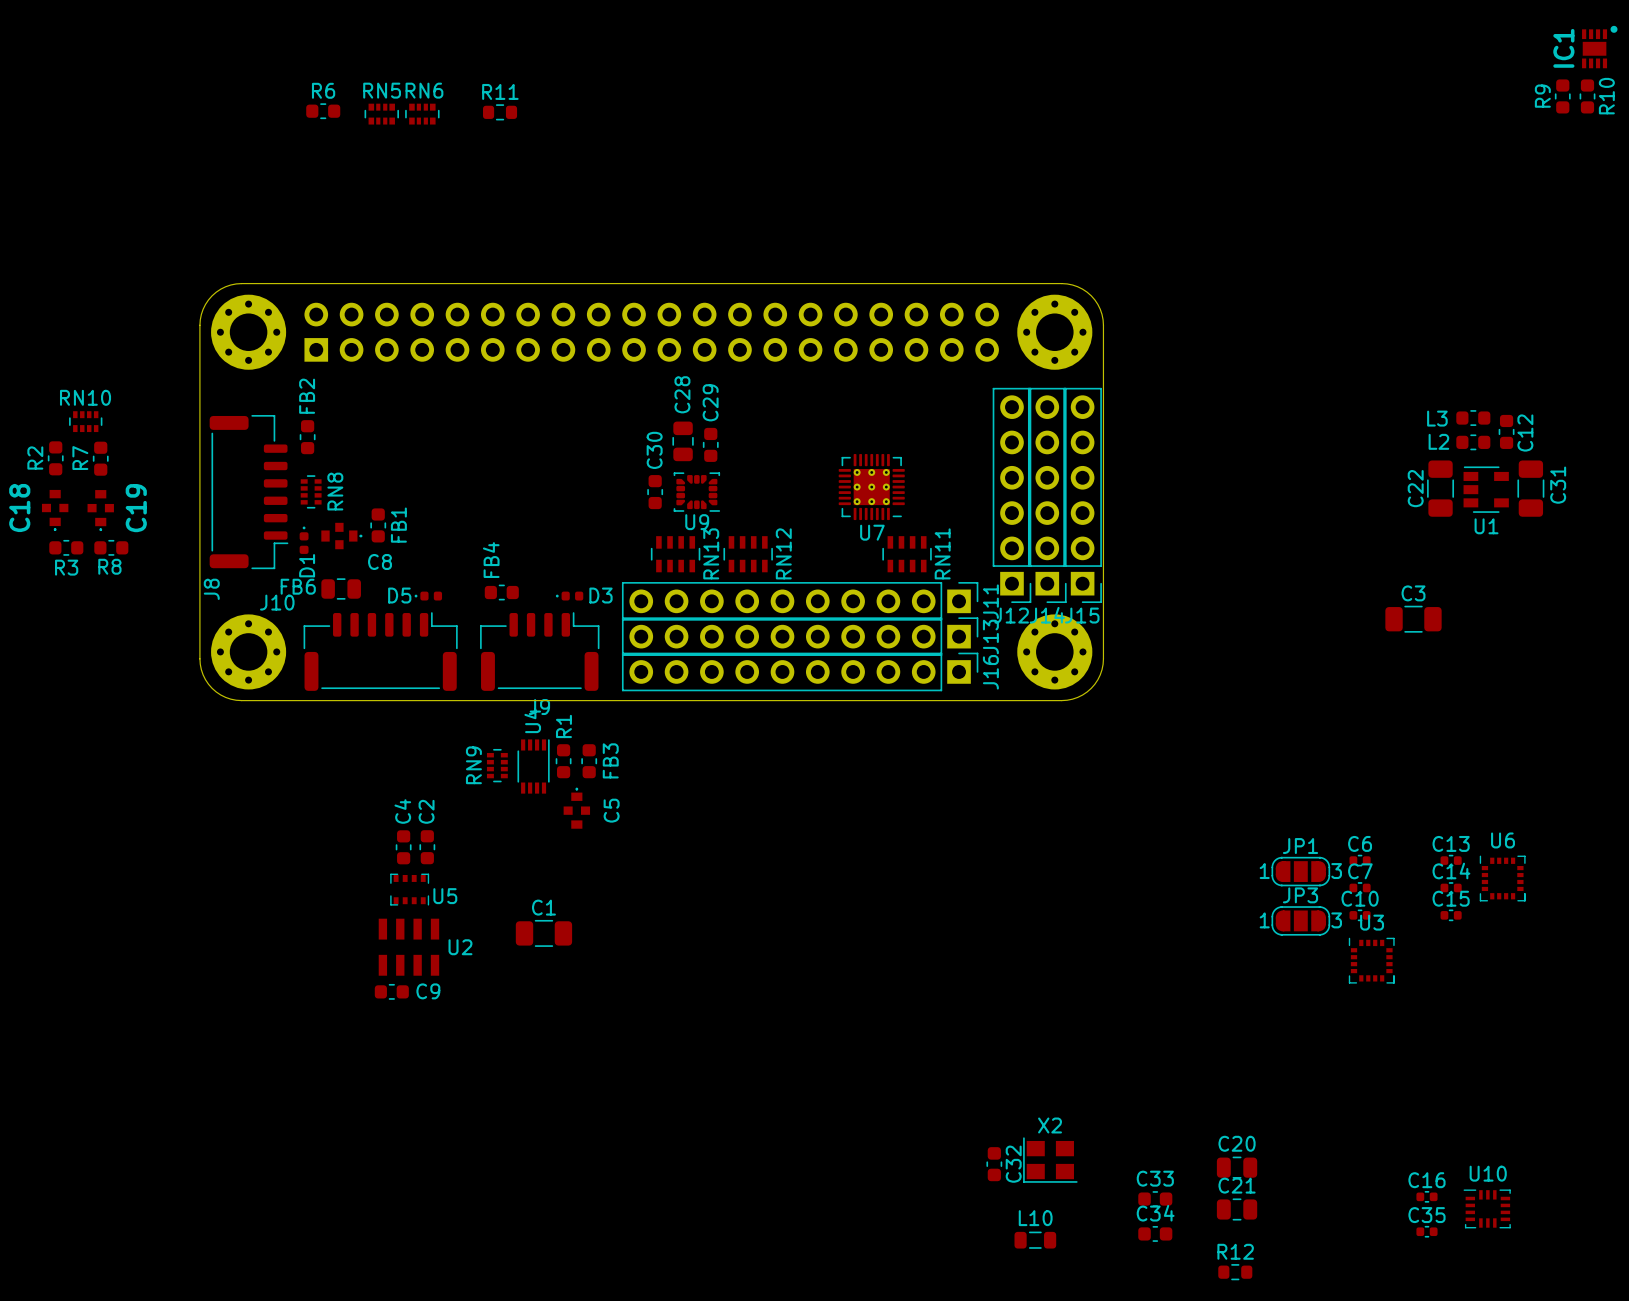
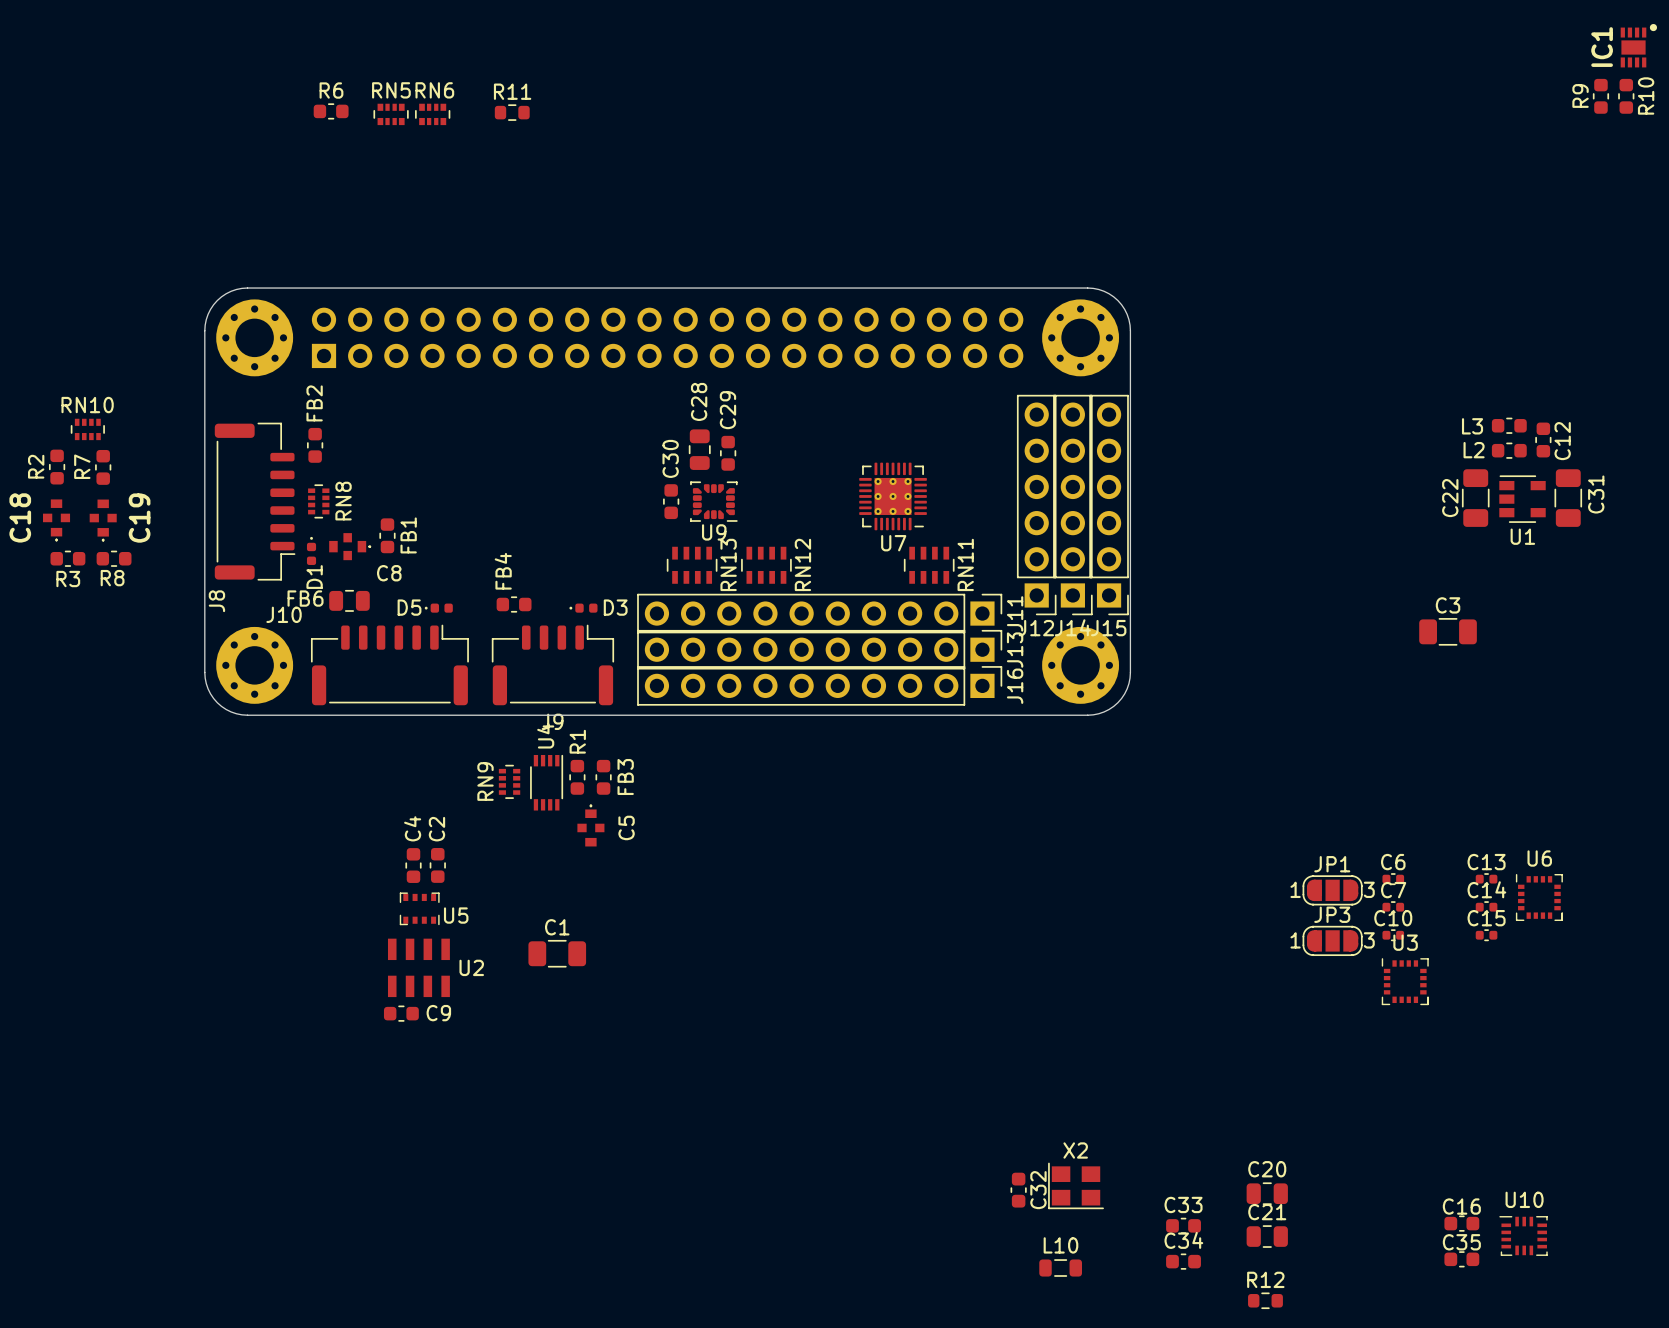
C16 footprint: [1416, 1191, 1438, 1203] -> [1444, 1215, 1480, 1232]
C35 footprint: [1416, 1225, 1438, 1238] -> [1444, 1251, 1480, 1268]

